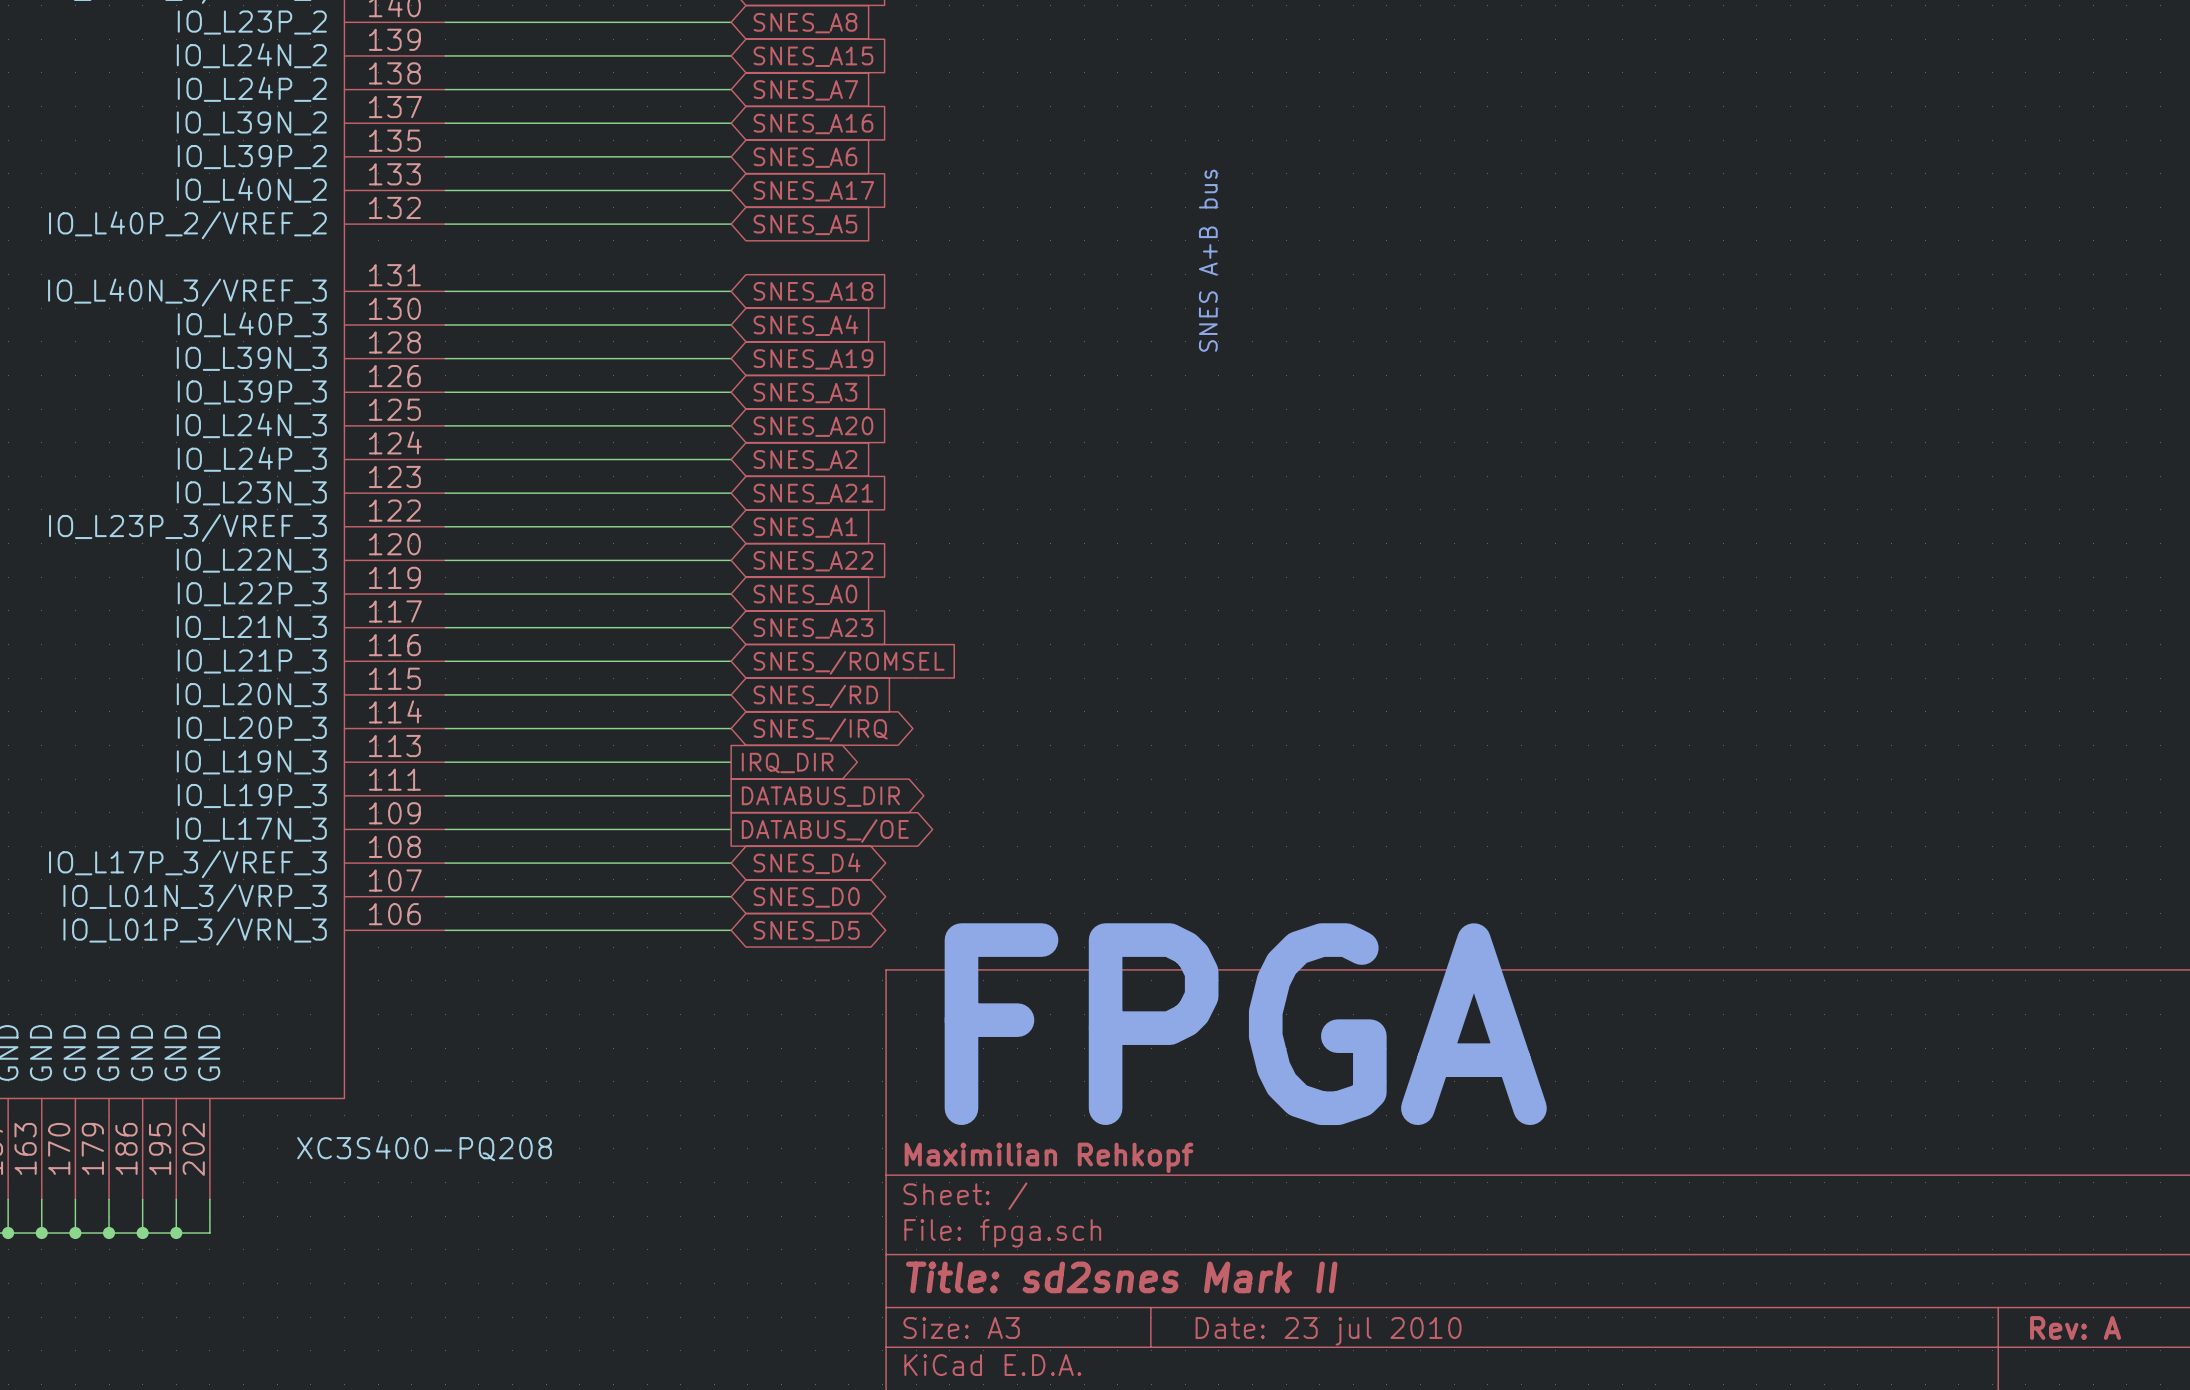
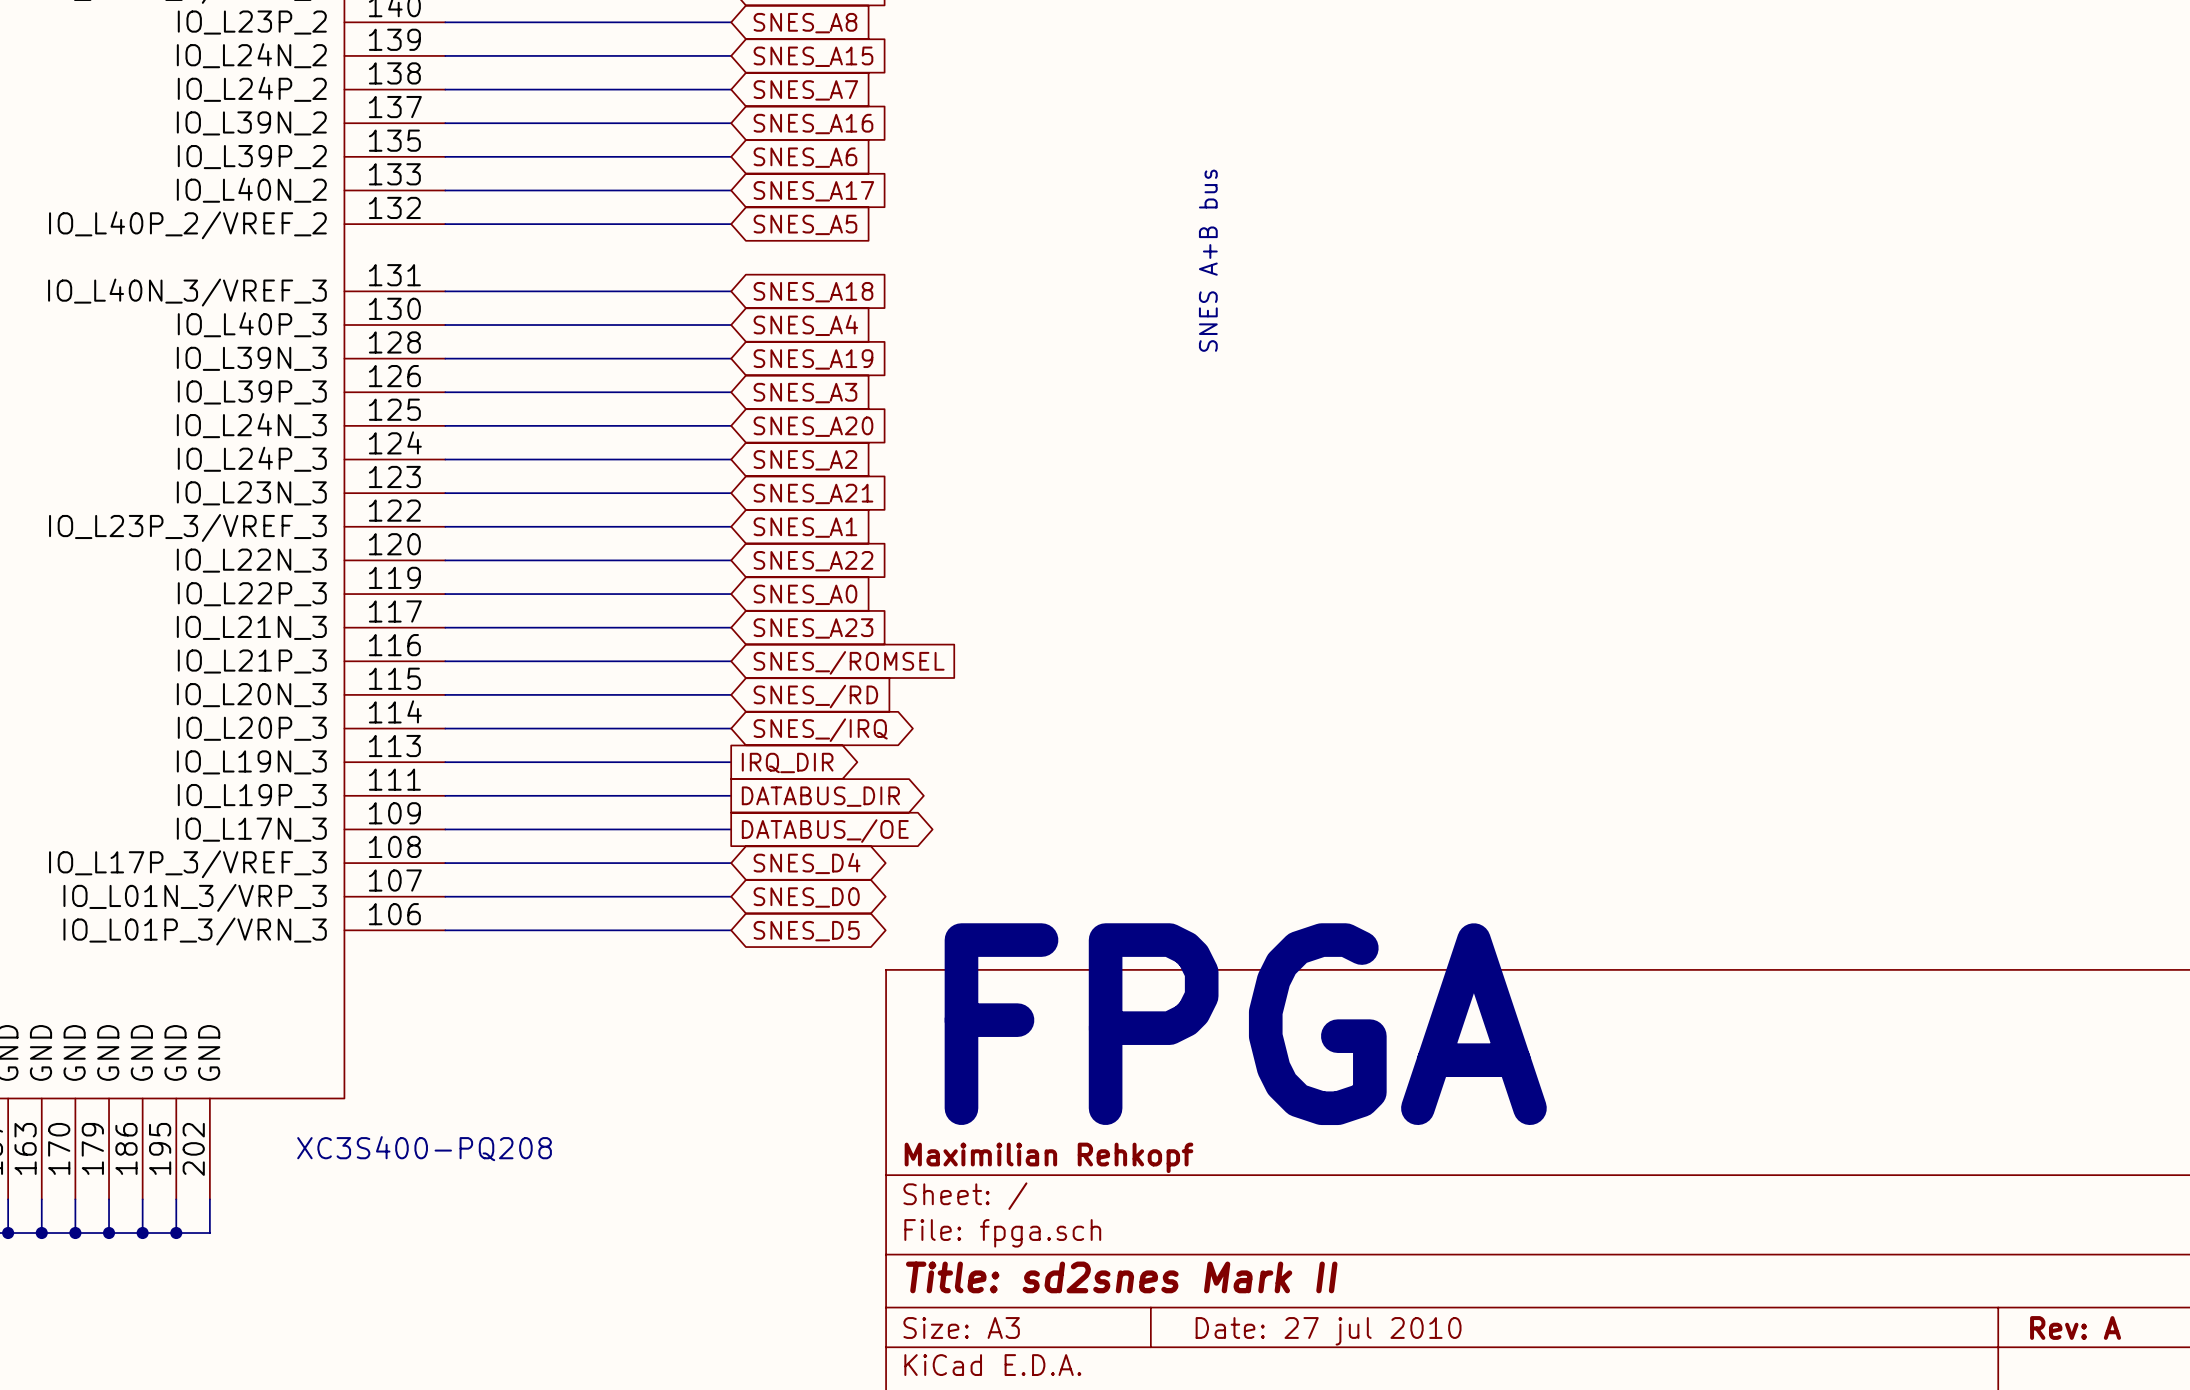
title block: Date: 23 jul 2010 (1328, 1331) -> Date: 27 jul 2010 (1328, 1331)

